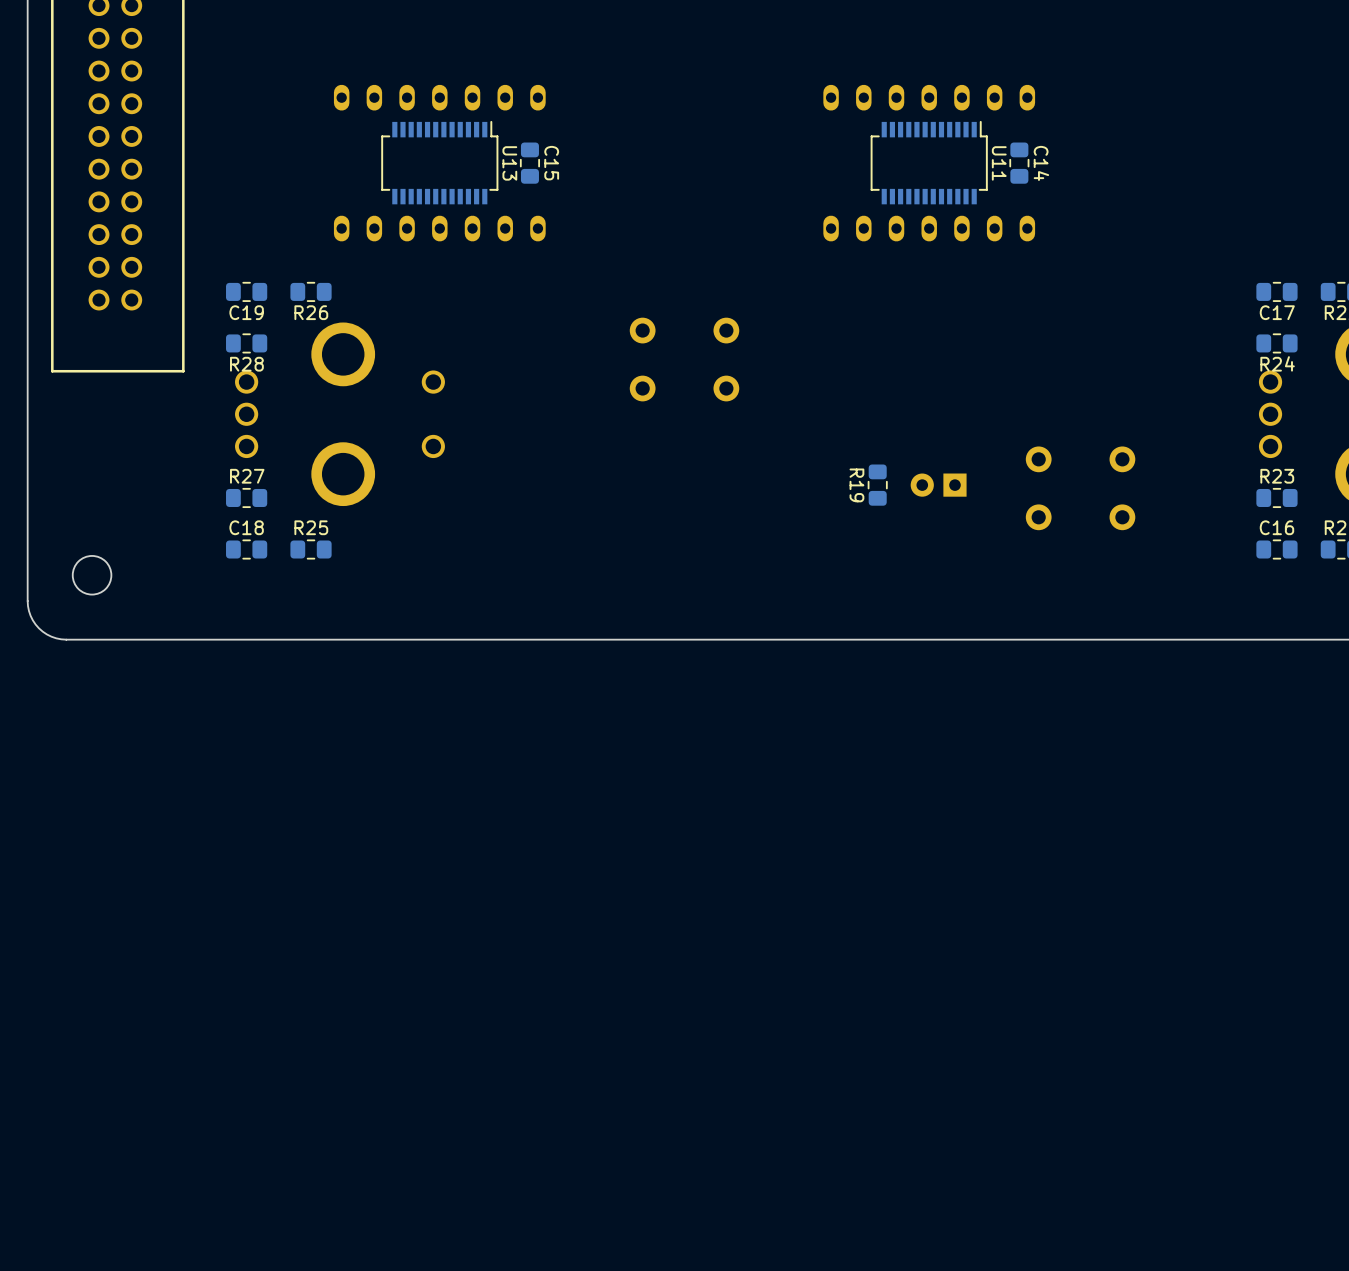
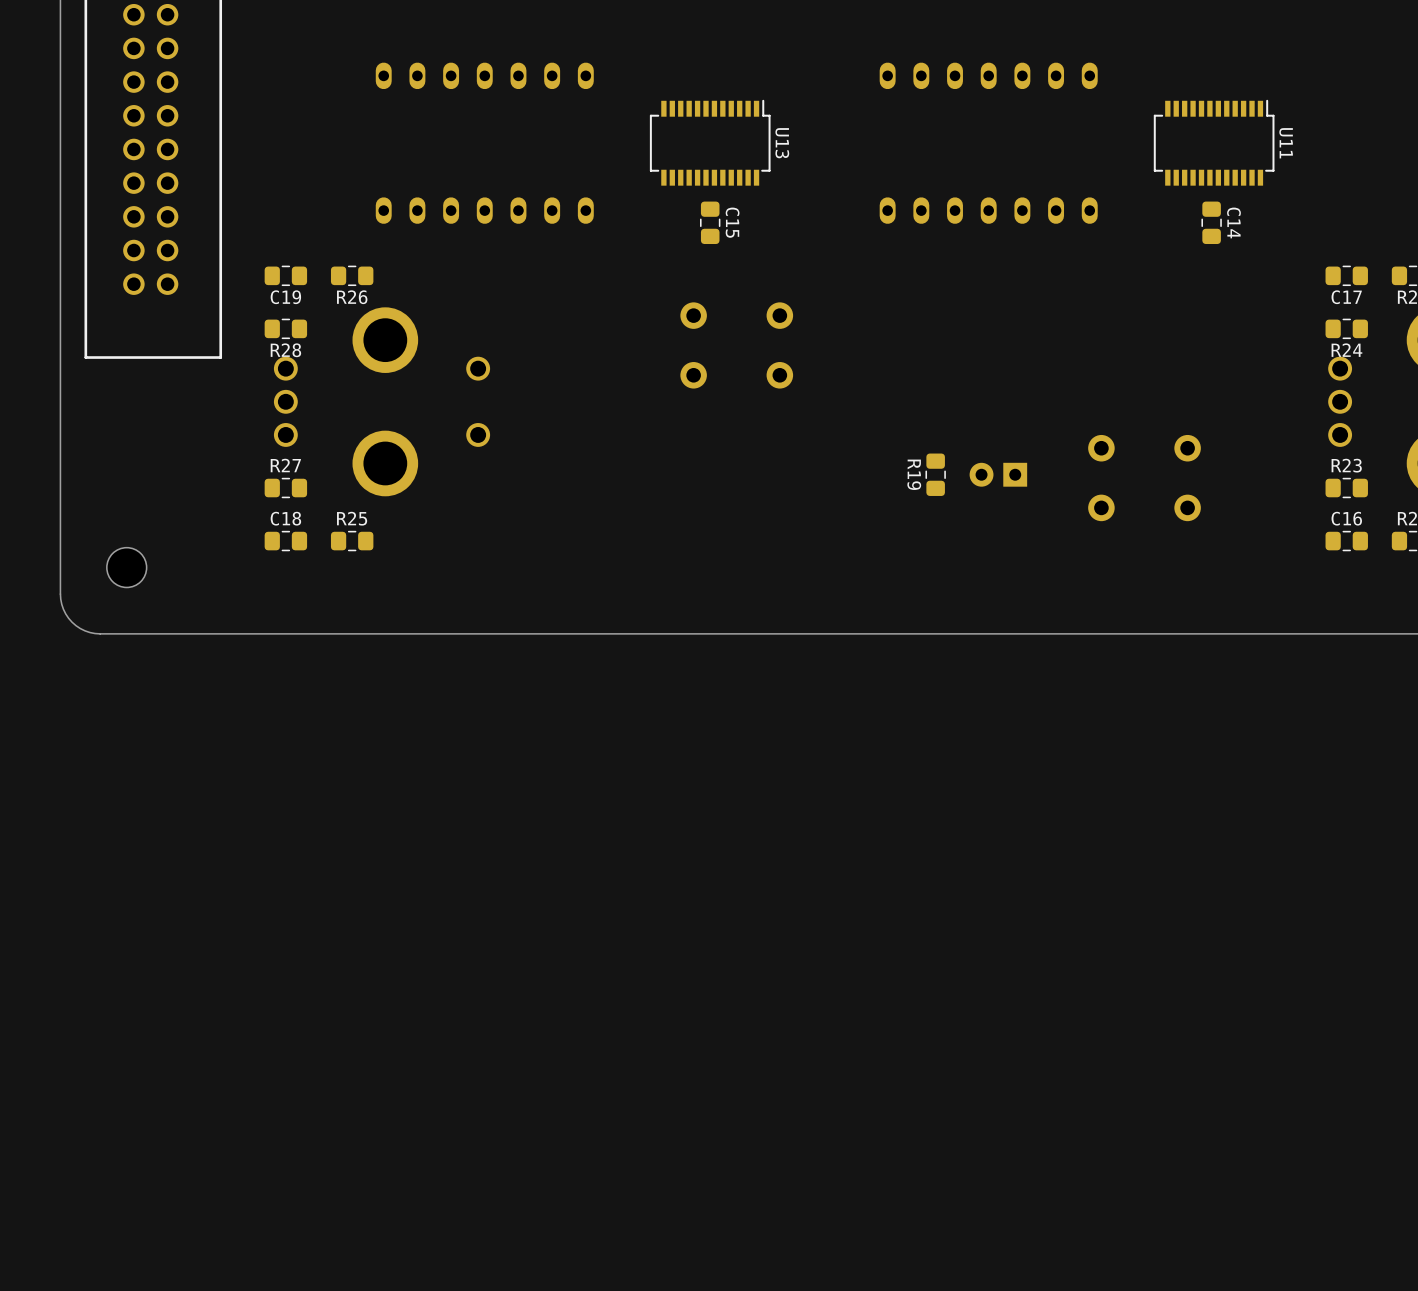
U13 position: (439, 162) -> (710, 142)
U11 position: (929, 162) -> (1214, 142)
C15 position: (529, 163) -> (710, 222)
C14 position: (1019, 163) -> (1211, 222)

